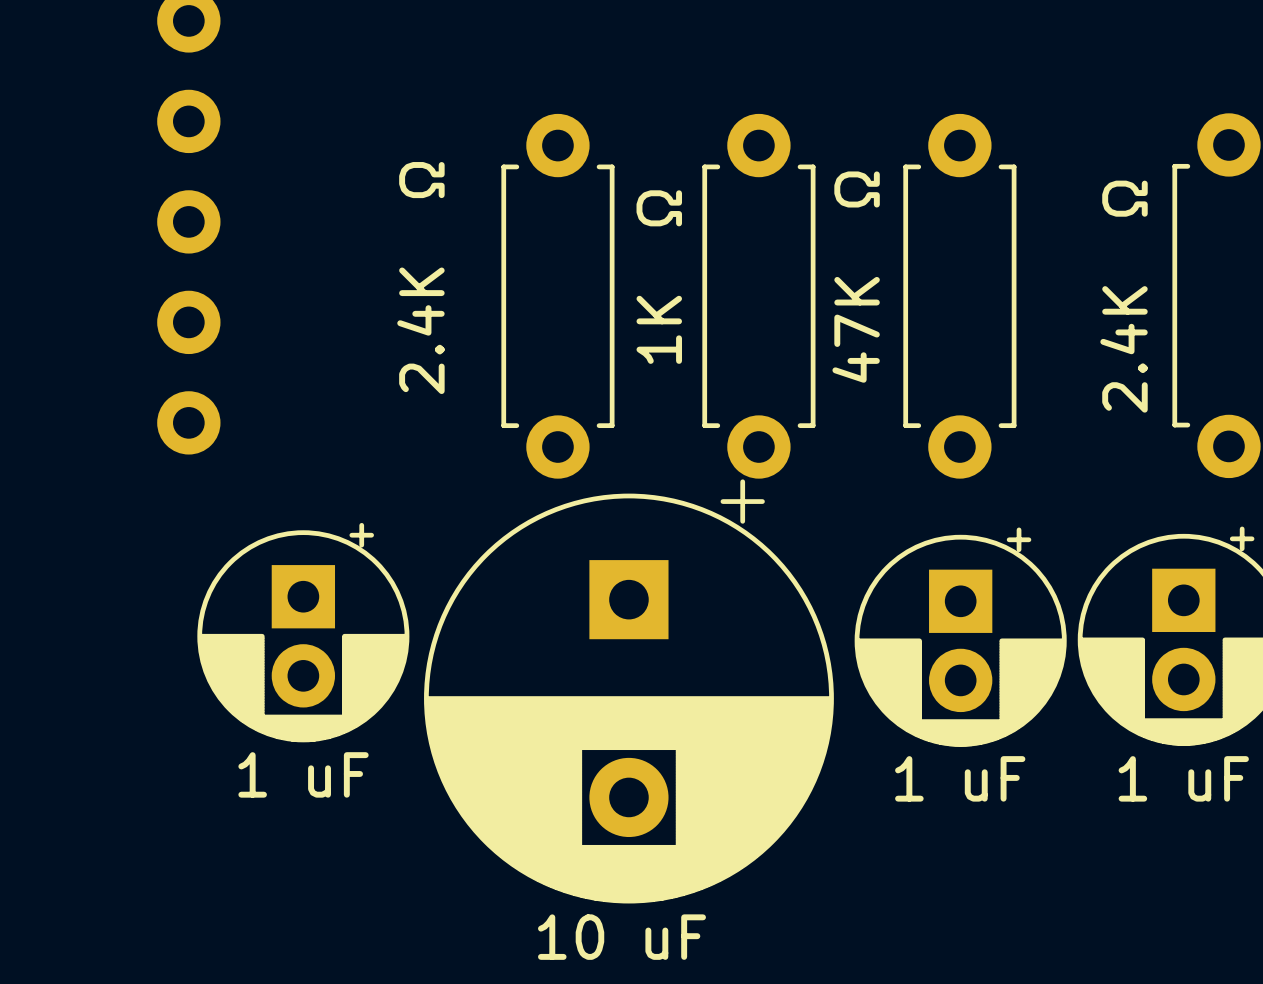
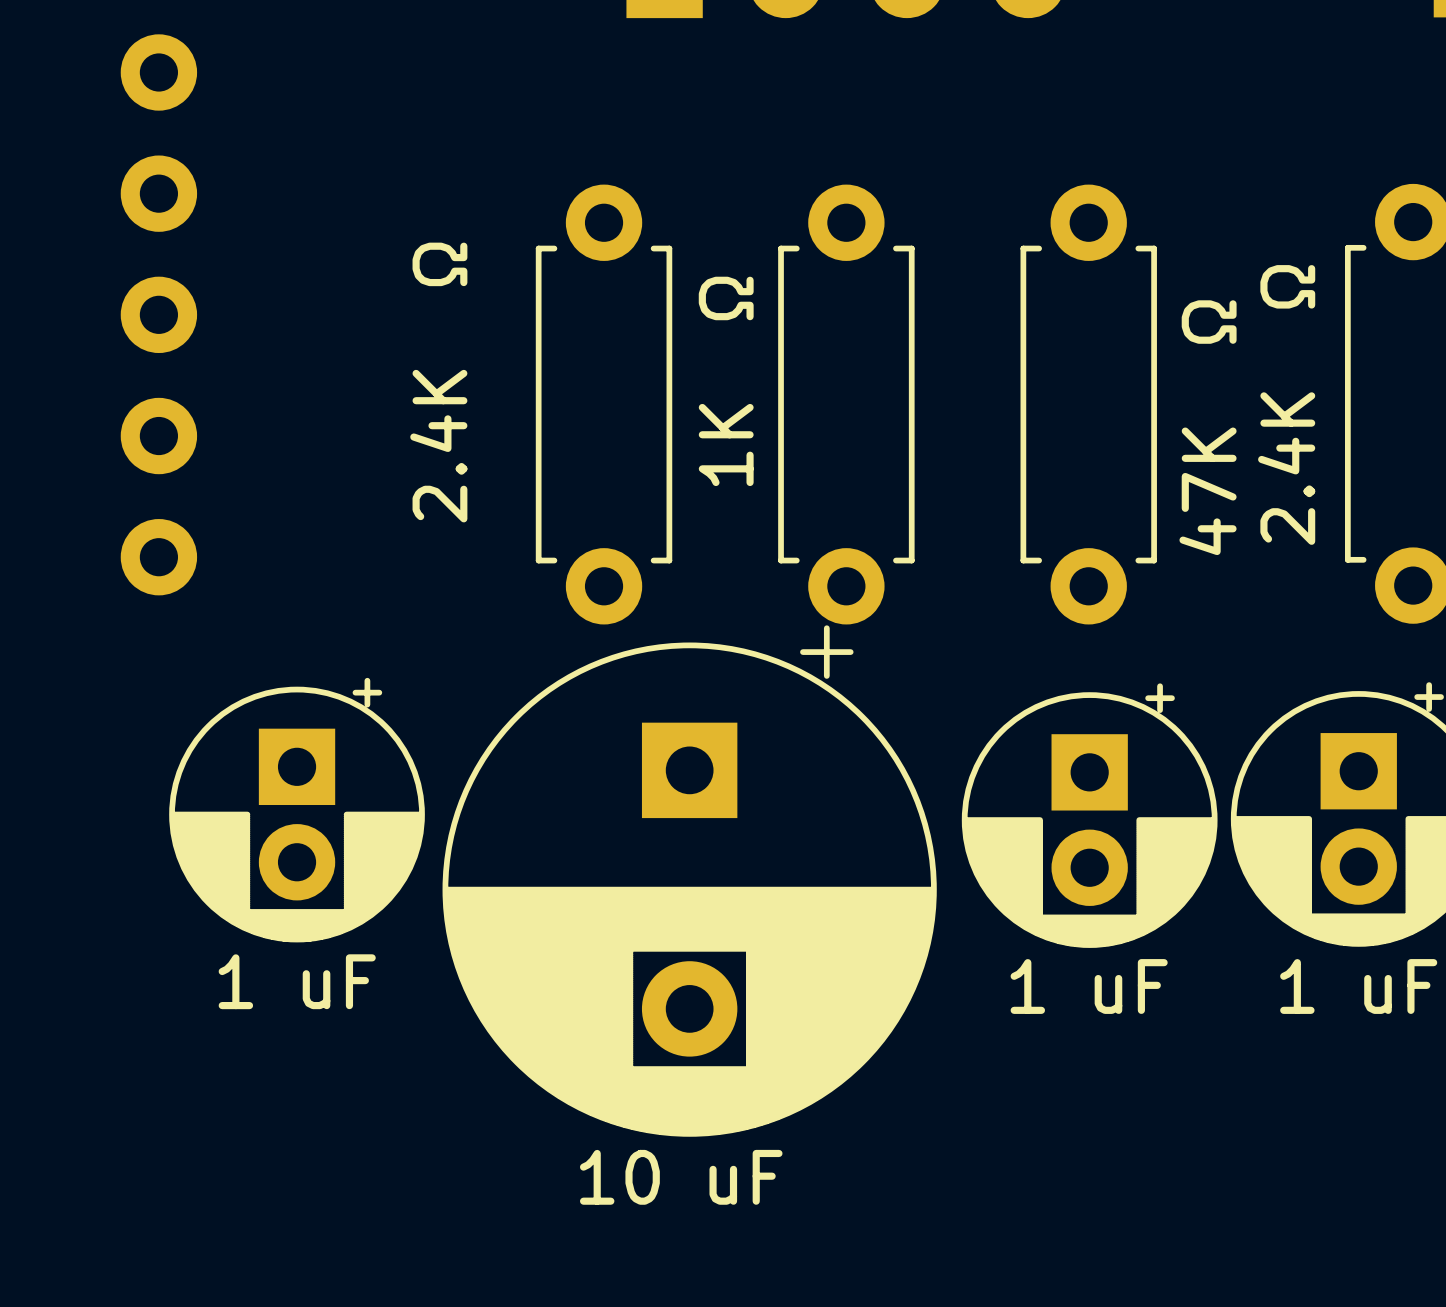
part value position: 47K Ω (856, 277) -> 47K Ω (1208, 427)

